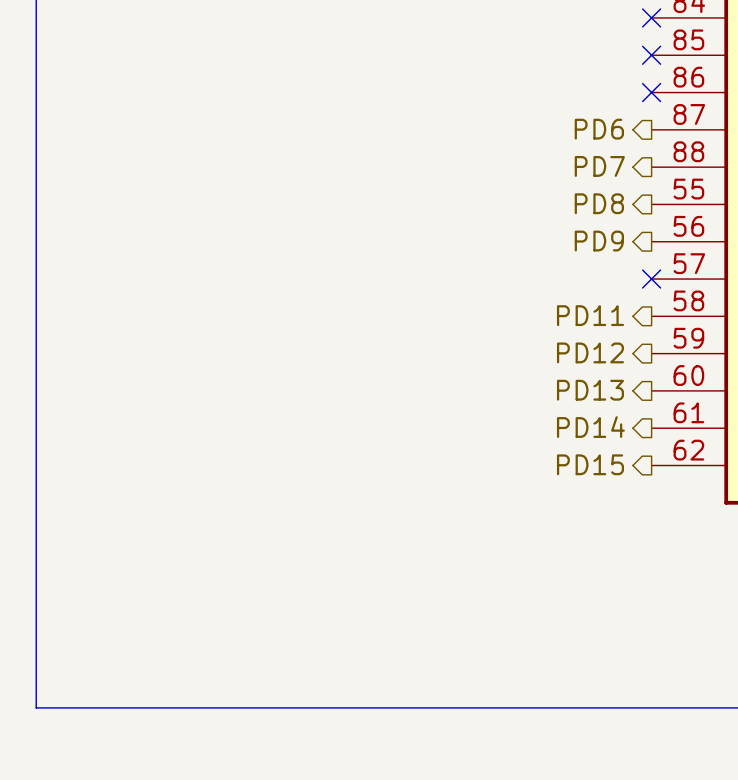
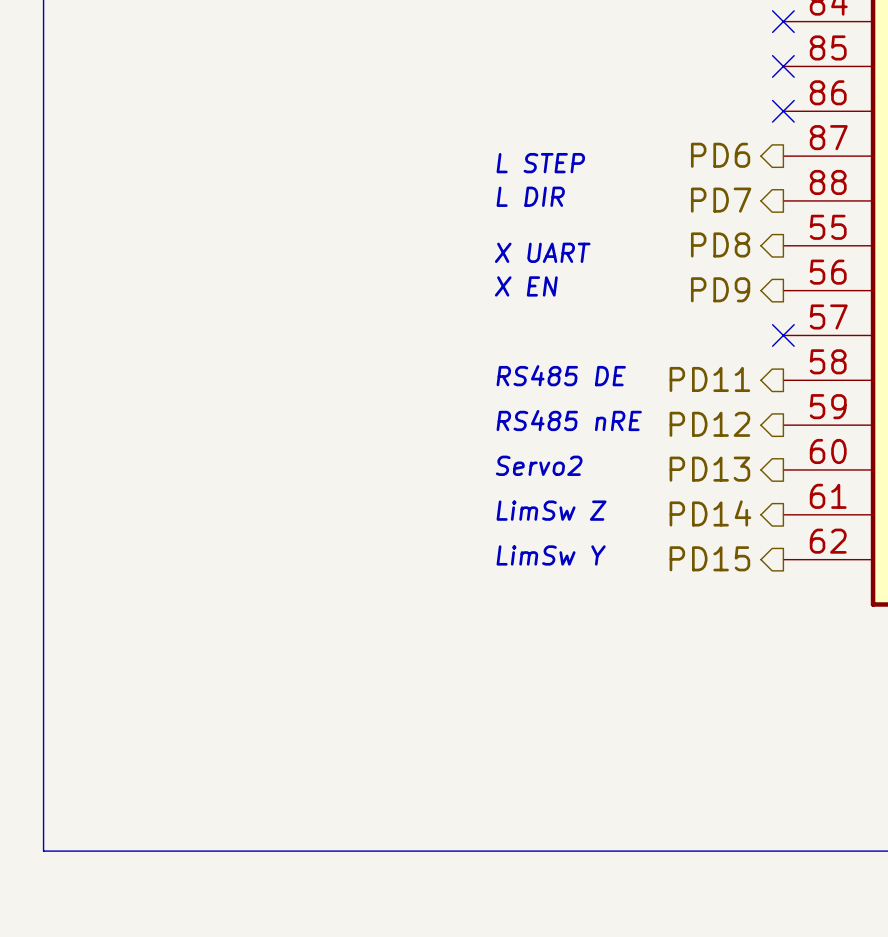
text: none -> L STEP (540, 163)
text: none -> L DIR (530, 196)
text: none -> X UART (542, 252)
text: none -> X EN (526, 286)
text: none -> RS485 DE (561, 375)
text: none -> RS485 nRE (569, 420)
text: none -> Servo2 (539, 465)
text: none -> LimSw Z (551, 510)
text: none -> LimSw Y (551, 555)

